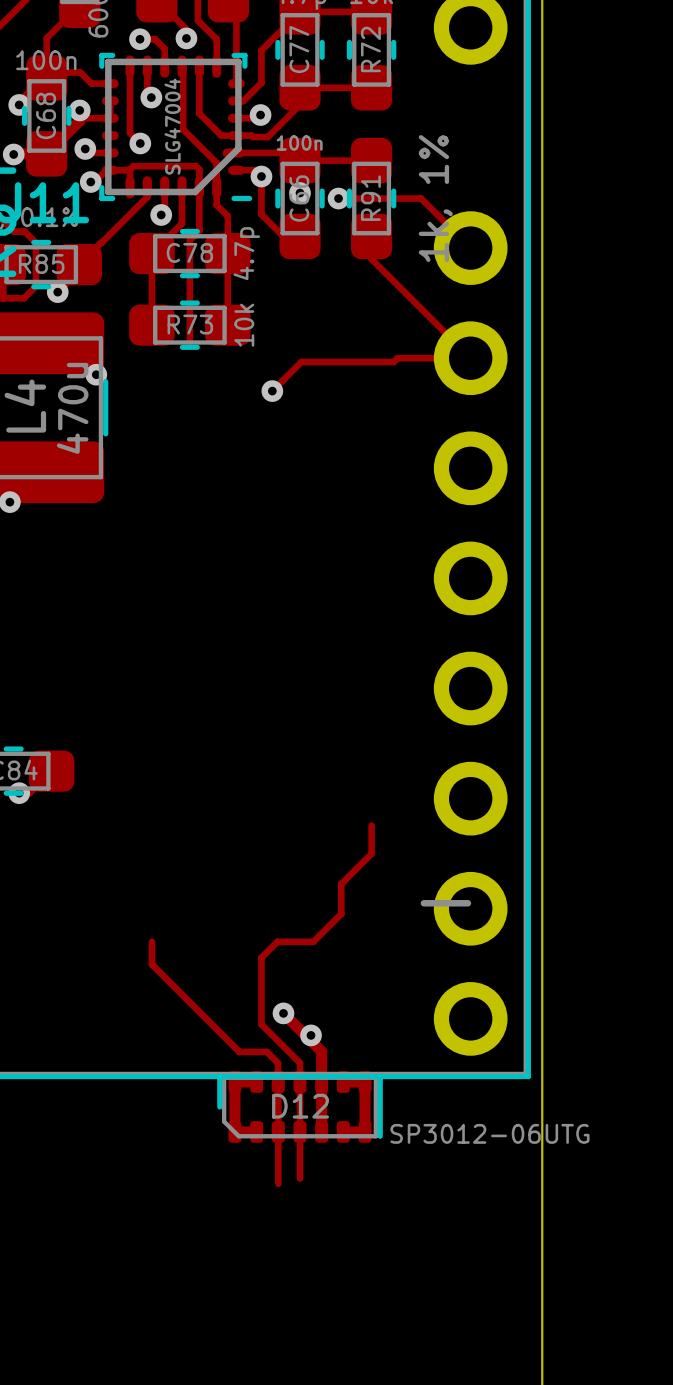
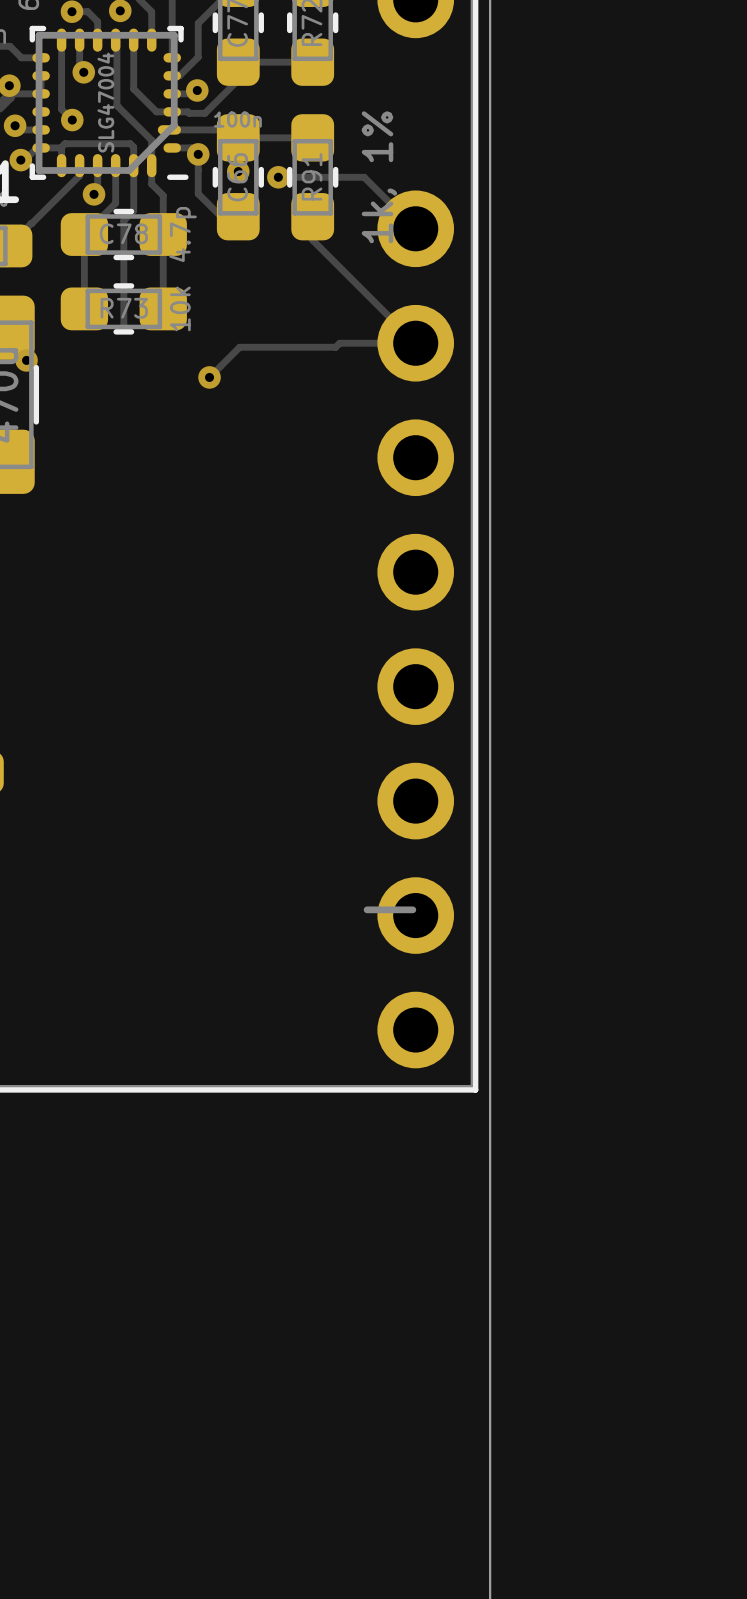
track: (371, 825) (371, 853) (341, 884) (341, 913) (313, 941) (277, 941) (261, 957) (261, 1024) (300, 1062) (300, 1178) -> none
track: (151, 941) (151, 964) (239, 1051) (266, 1051) (277, 1062) (277, 1081) -> none
track: (283, 1013) (321, 1051) (321, 1131) -> none
via: (283, 1013) -> none
via: (311, 1035) -> none
track: (256, 1082) (234, 1082) (234, 1131) (256, 1131) -> none
track: (278, 1082) (278, 1183) -> none
track: (343, 1082) (365, 1082) (365, 1131) (343, 1131) -> none
D12: SP3012-06UTG (300, 1106) -> none

